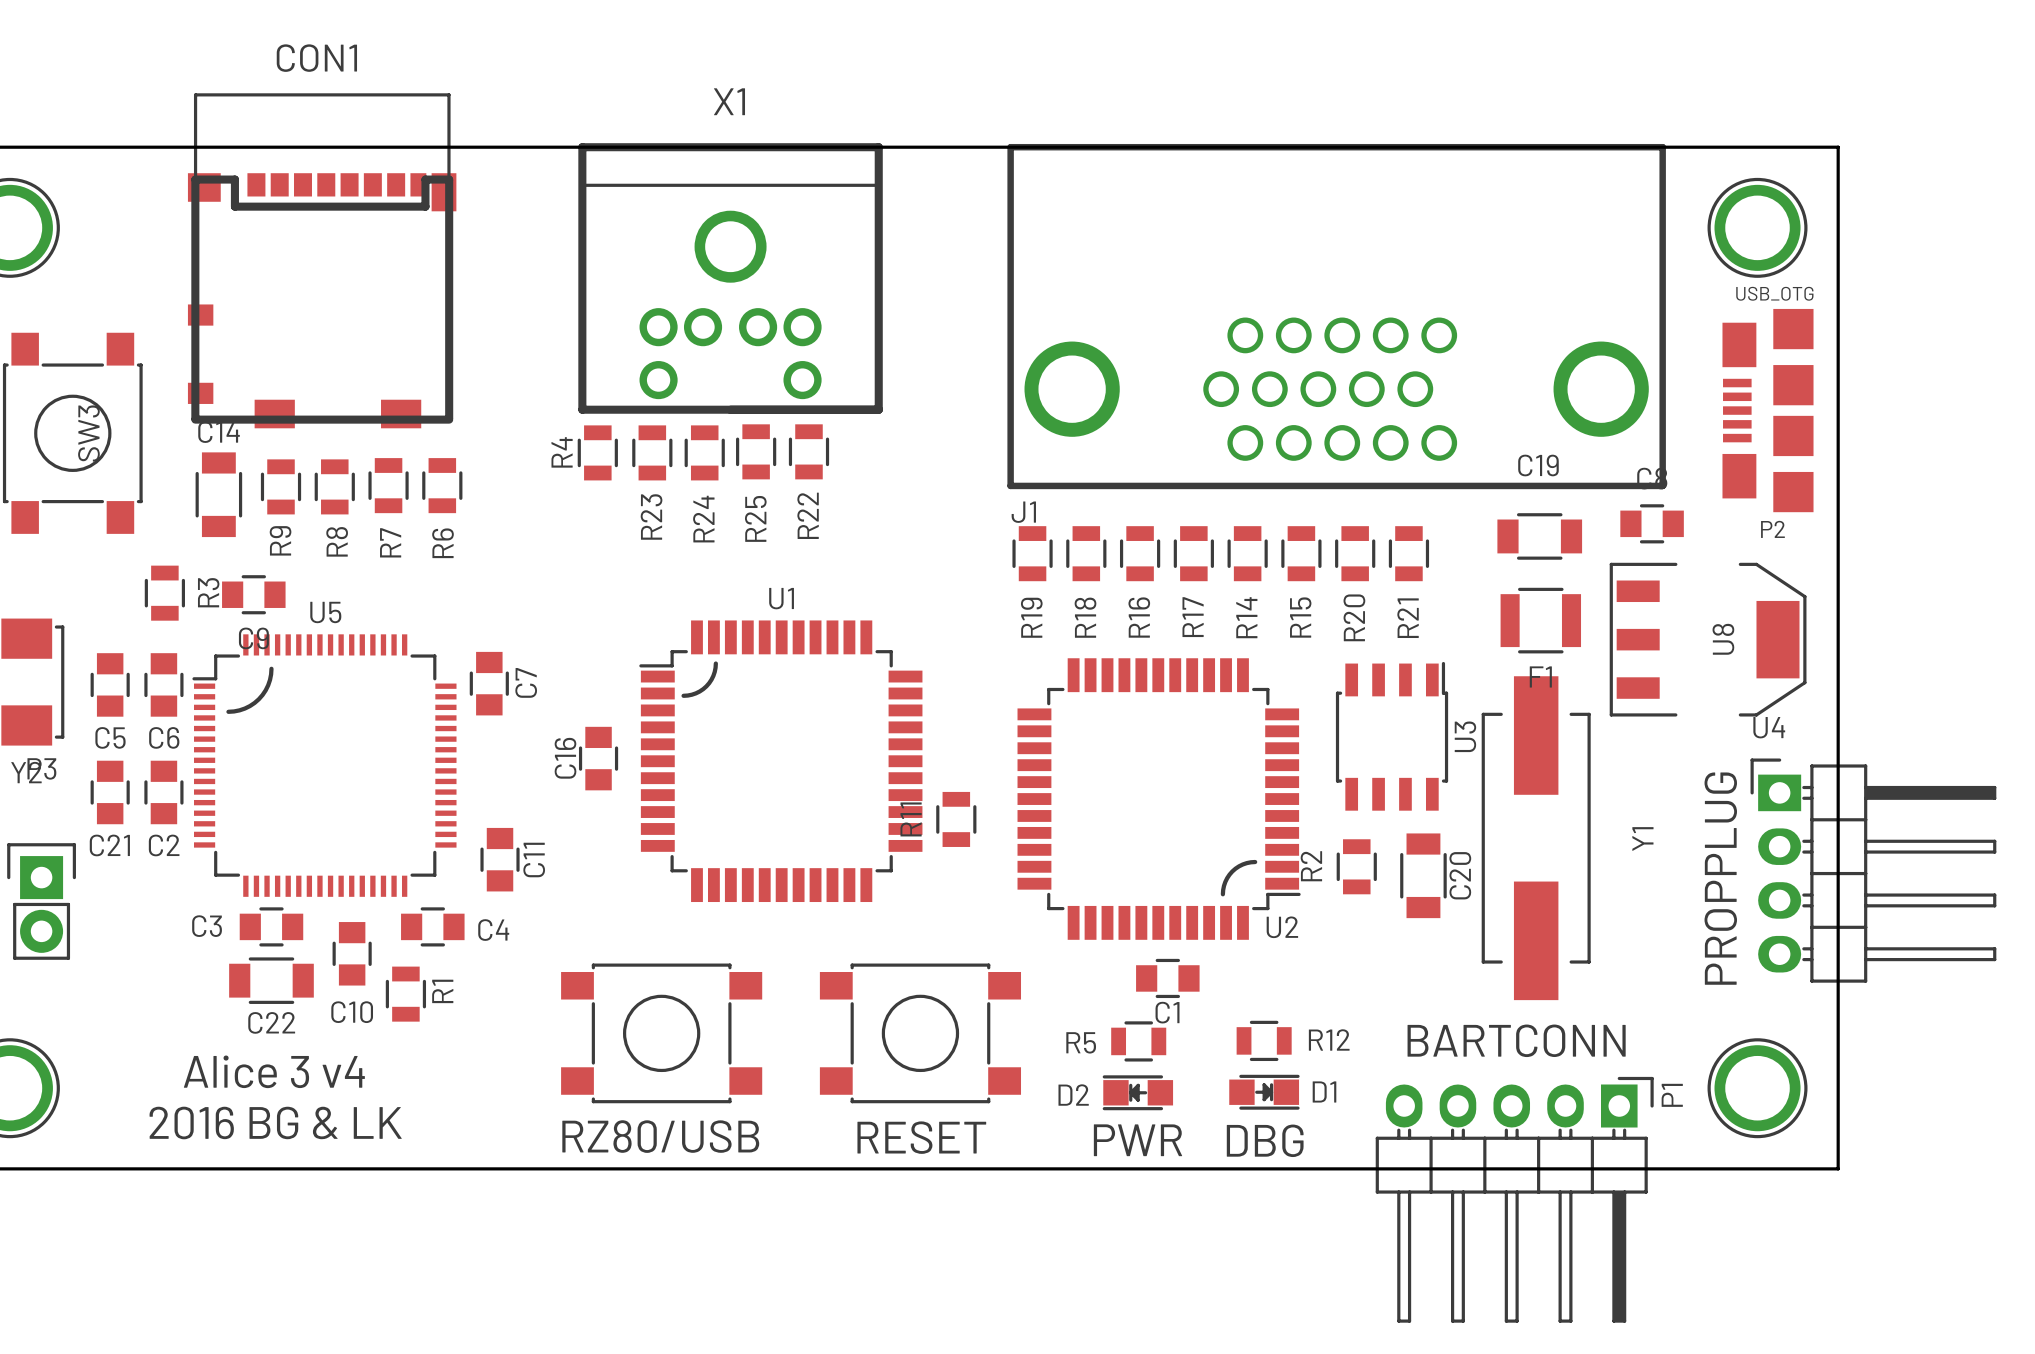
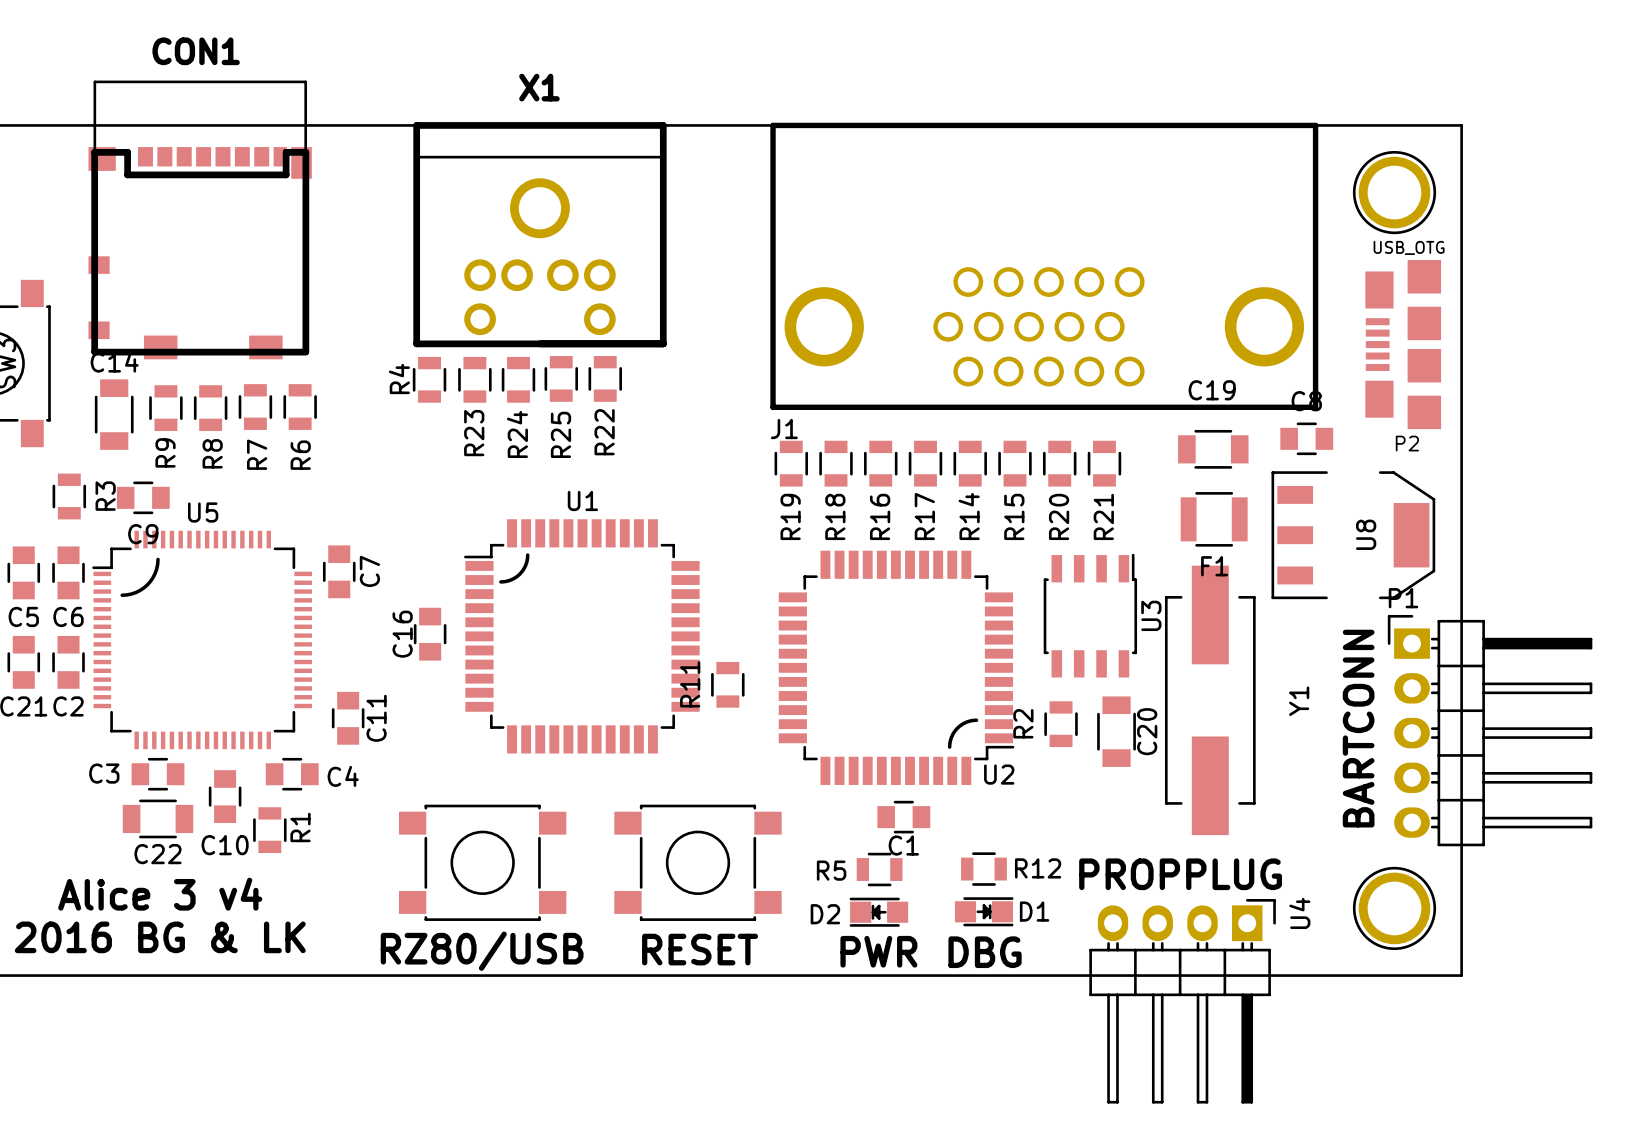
U4 rotation: 0° (1873, 870) -> 90° clockwise (1182, 1001)
U4 position: (1873, 870) -> (1182, 1001)
text: PROPPLUG (1720, 878) -> BARTCONN (1358, 728)
text: BARTCONN (1516, 1040) -> PROPPLUG (1180, 874)
P1 rotation: 0° (1514, 1199) -> 90° counterclockwise (1490, 730)
P1 position: (1514, 1199) -> (1490, 730)

